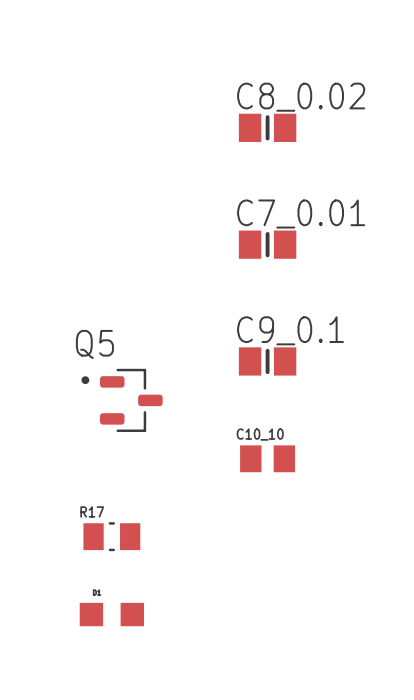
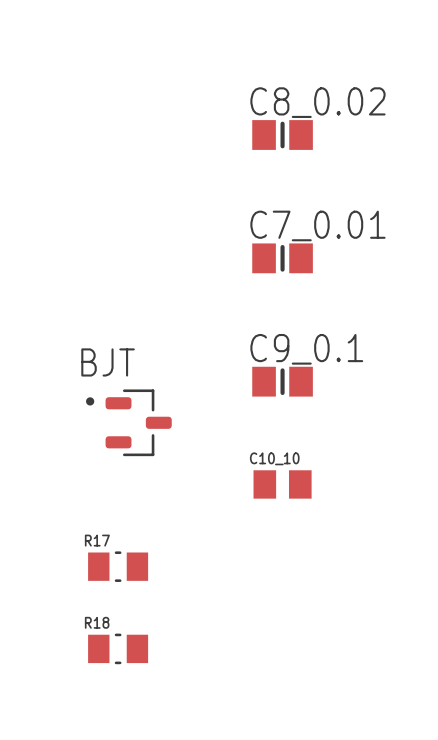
Q5 name: Q5 (94, 344) -> BJT (108, 362)
part: (111, 614) -> none
R18: none -> (118, 648)

